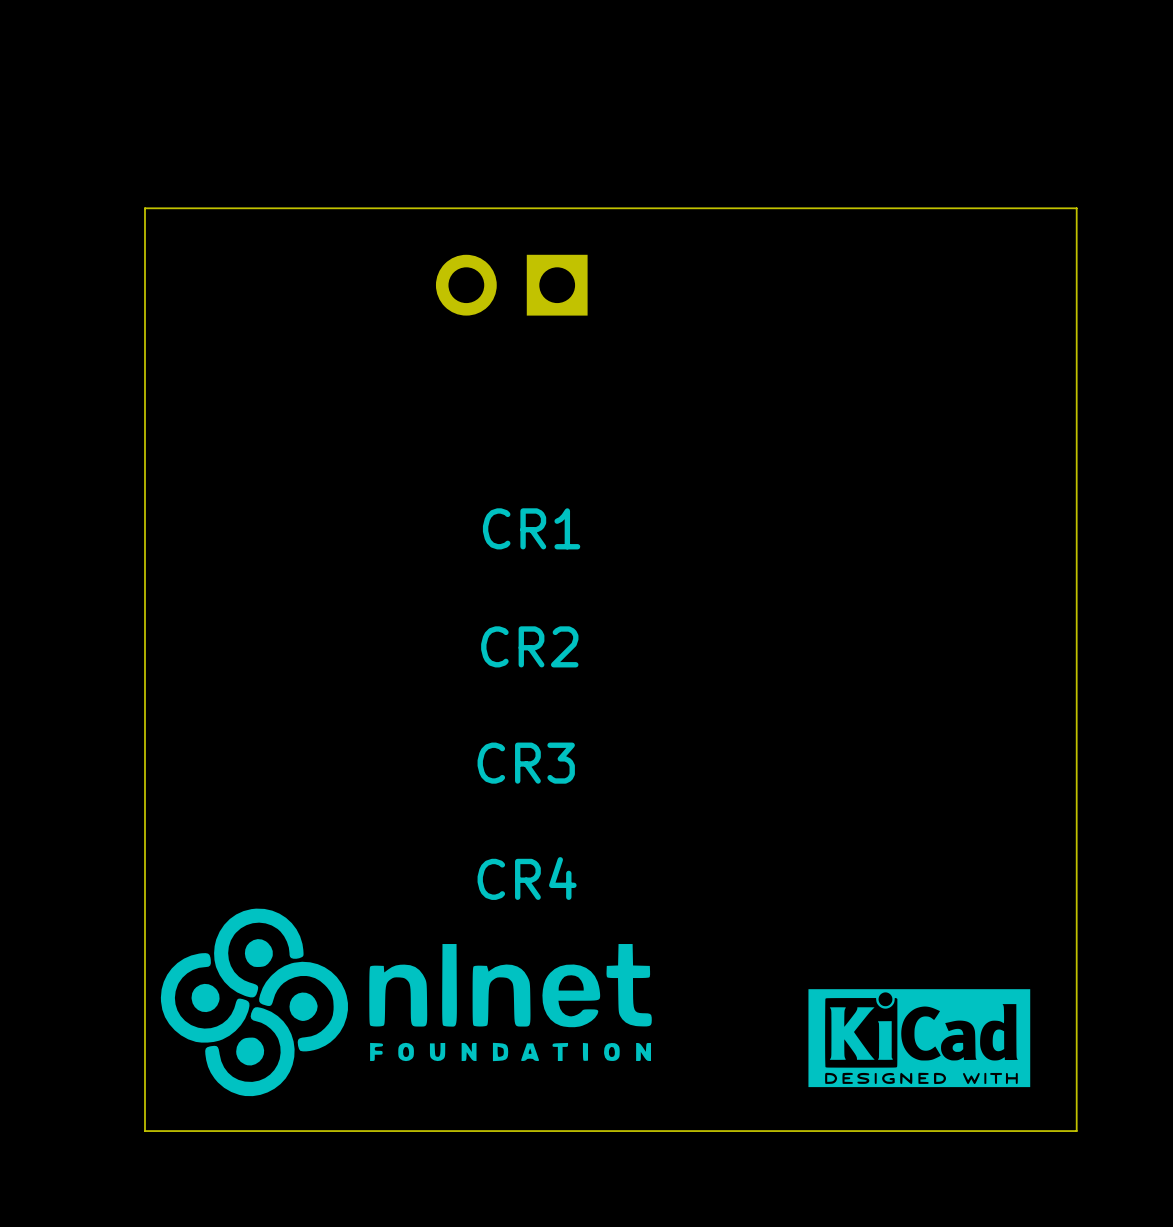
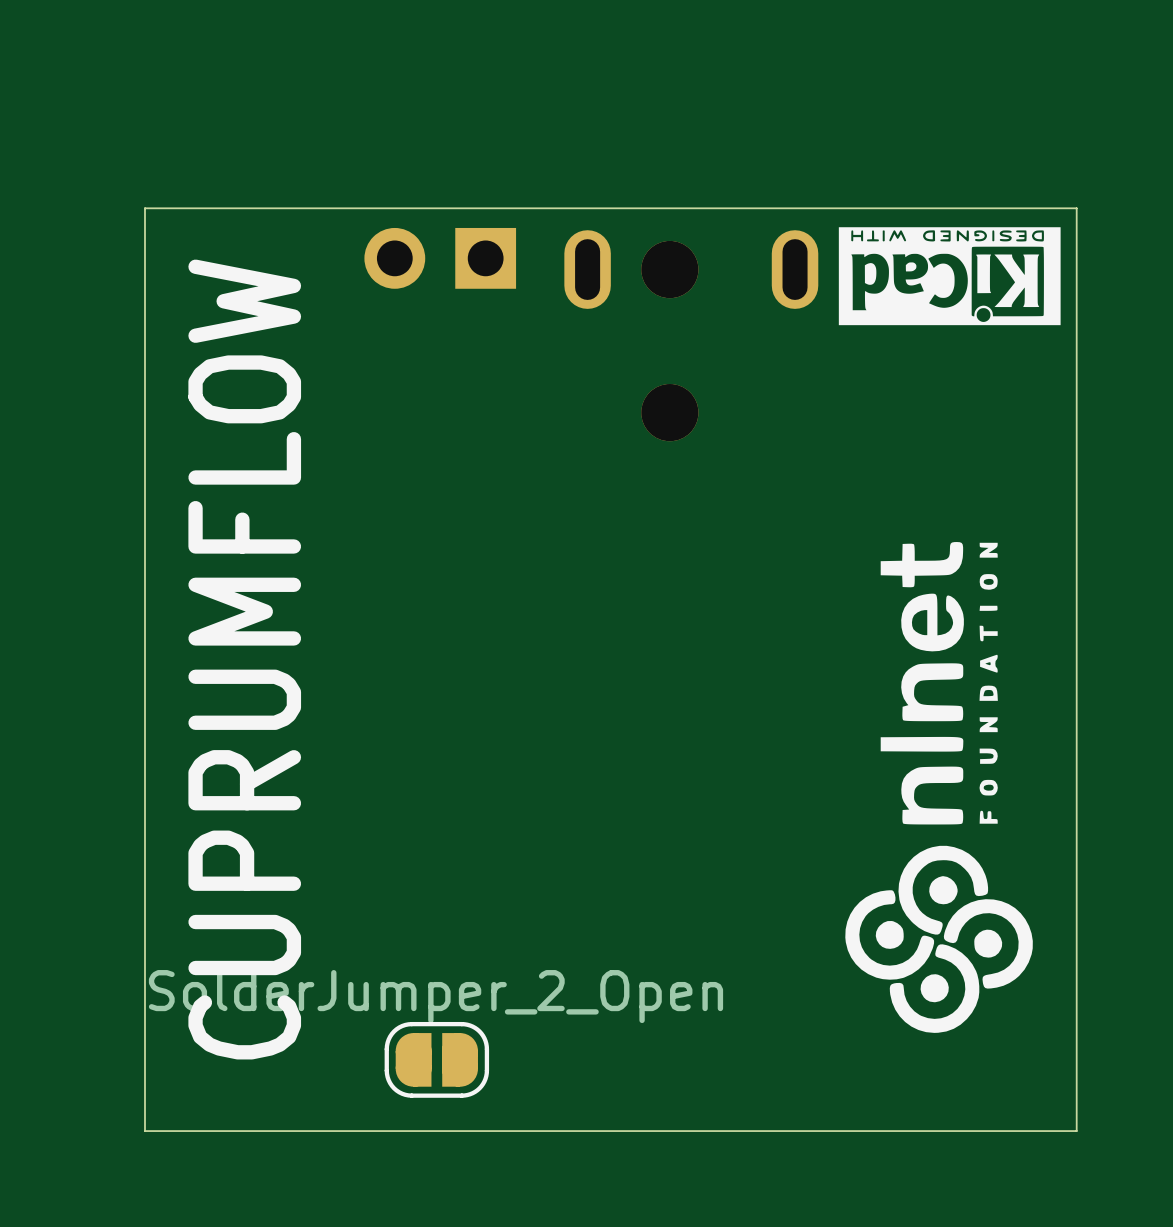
drawing: none -> [838, 227, 1061, 326]
part position: (511, 285) -> (440, 258)
part: none -> (691, 335)
CR1: (531, 528) -> none
drawing: none -> [845, 542, 1033, 1033]
CR2: (529, 646) -> none
text: none -> CUPRUMFLOW (244, 659)
CR3: (526, 763) -> none
CR4: (527, 878) -> none
drawing: [160, 908, 652, 1097] -> none
drawing: [808, 989, 1031, 1088] -> none
part: none -> SolderJumper_2_Open (436, 1059)

